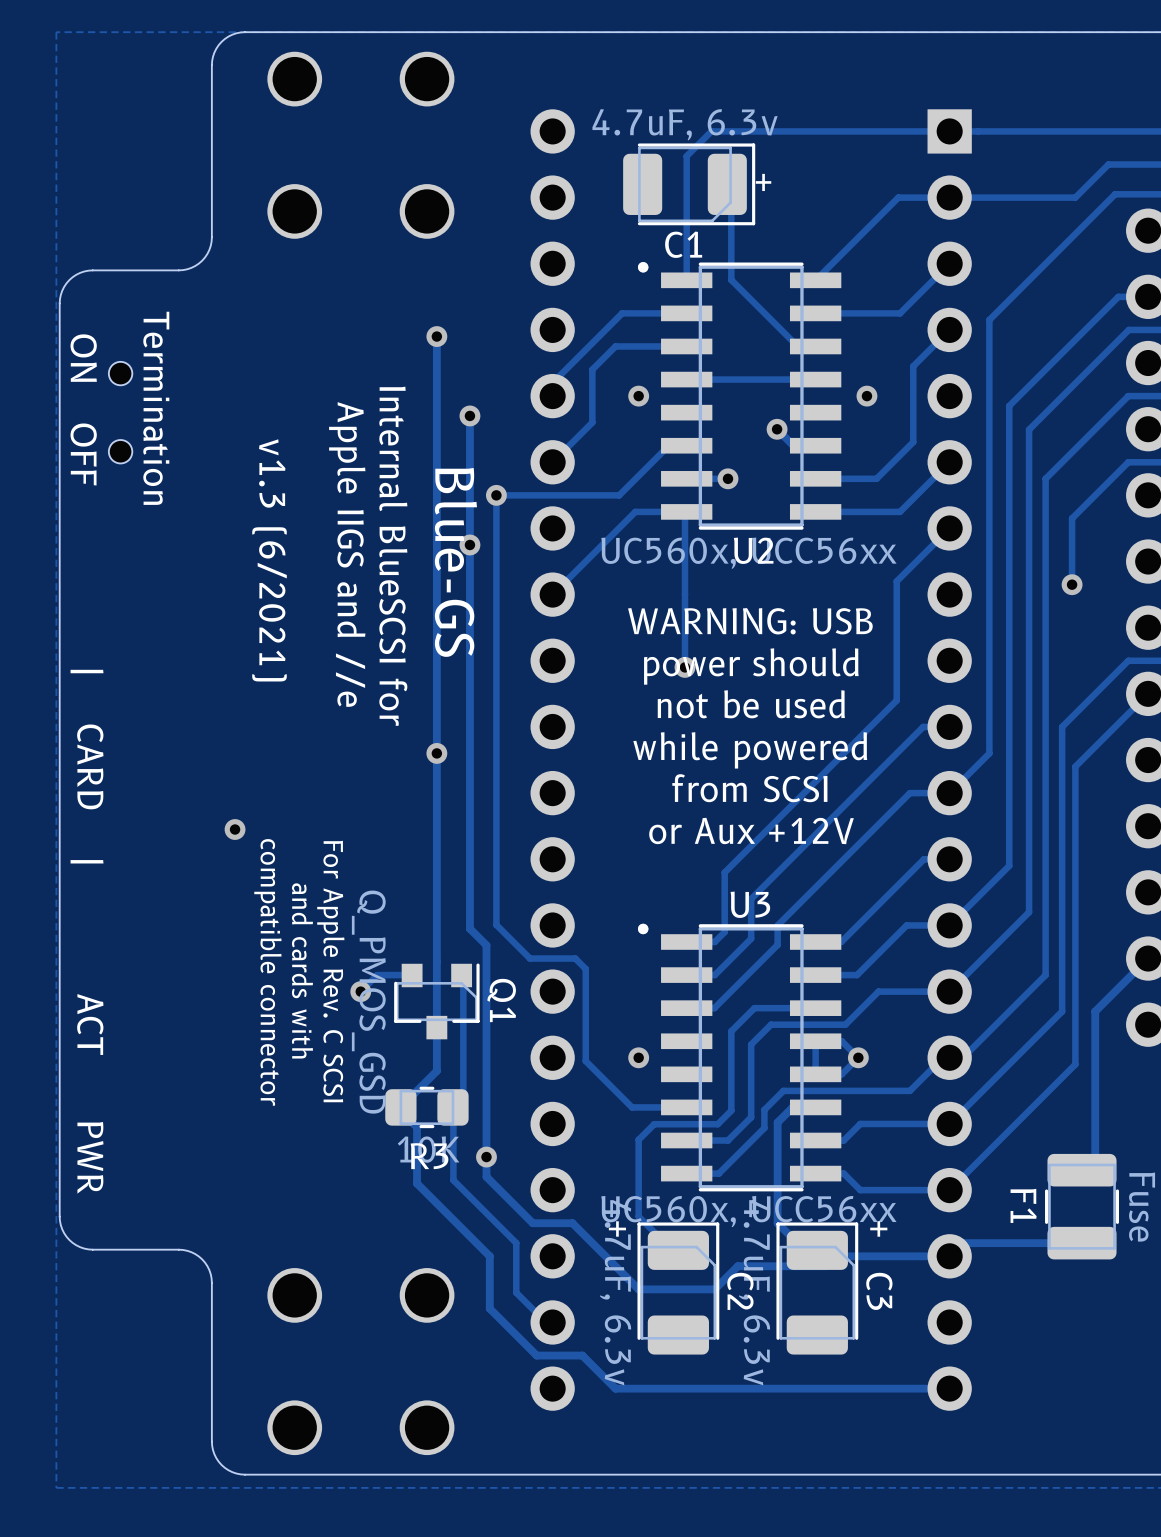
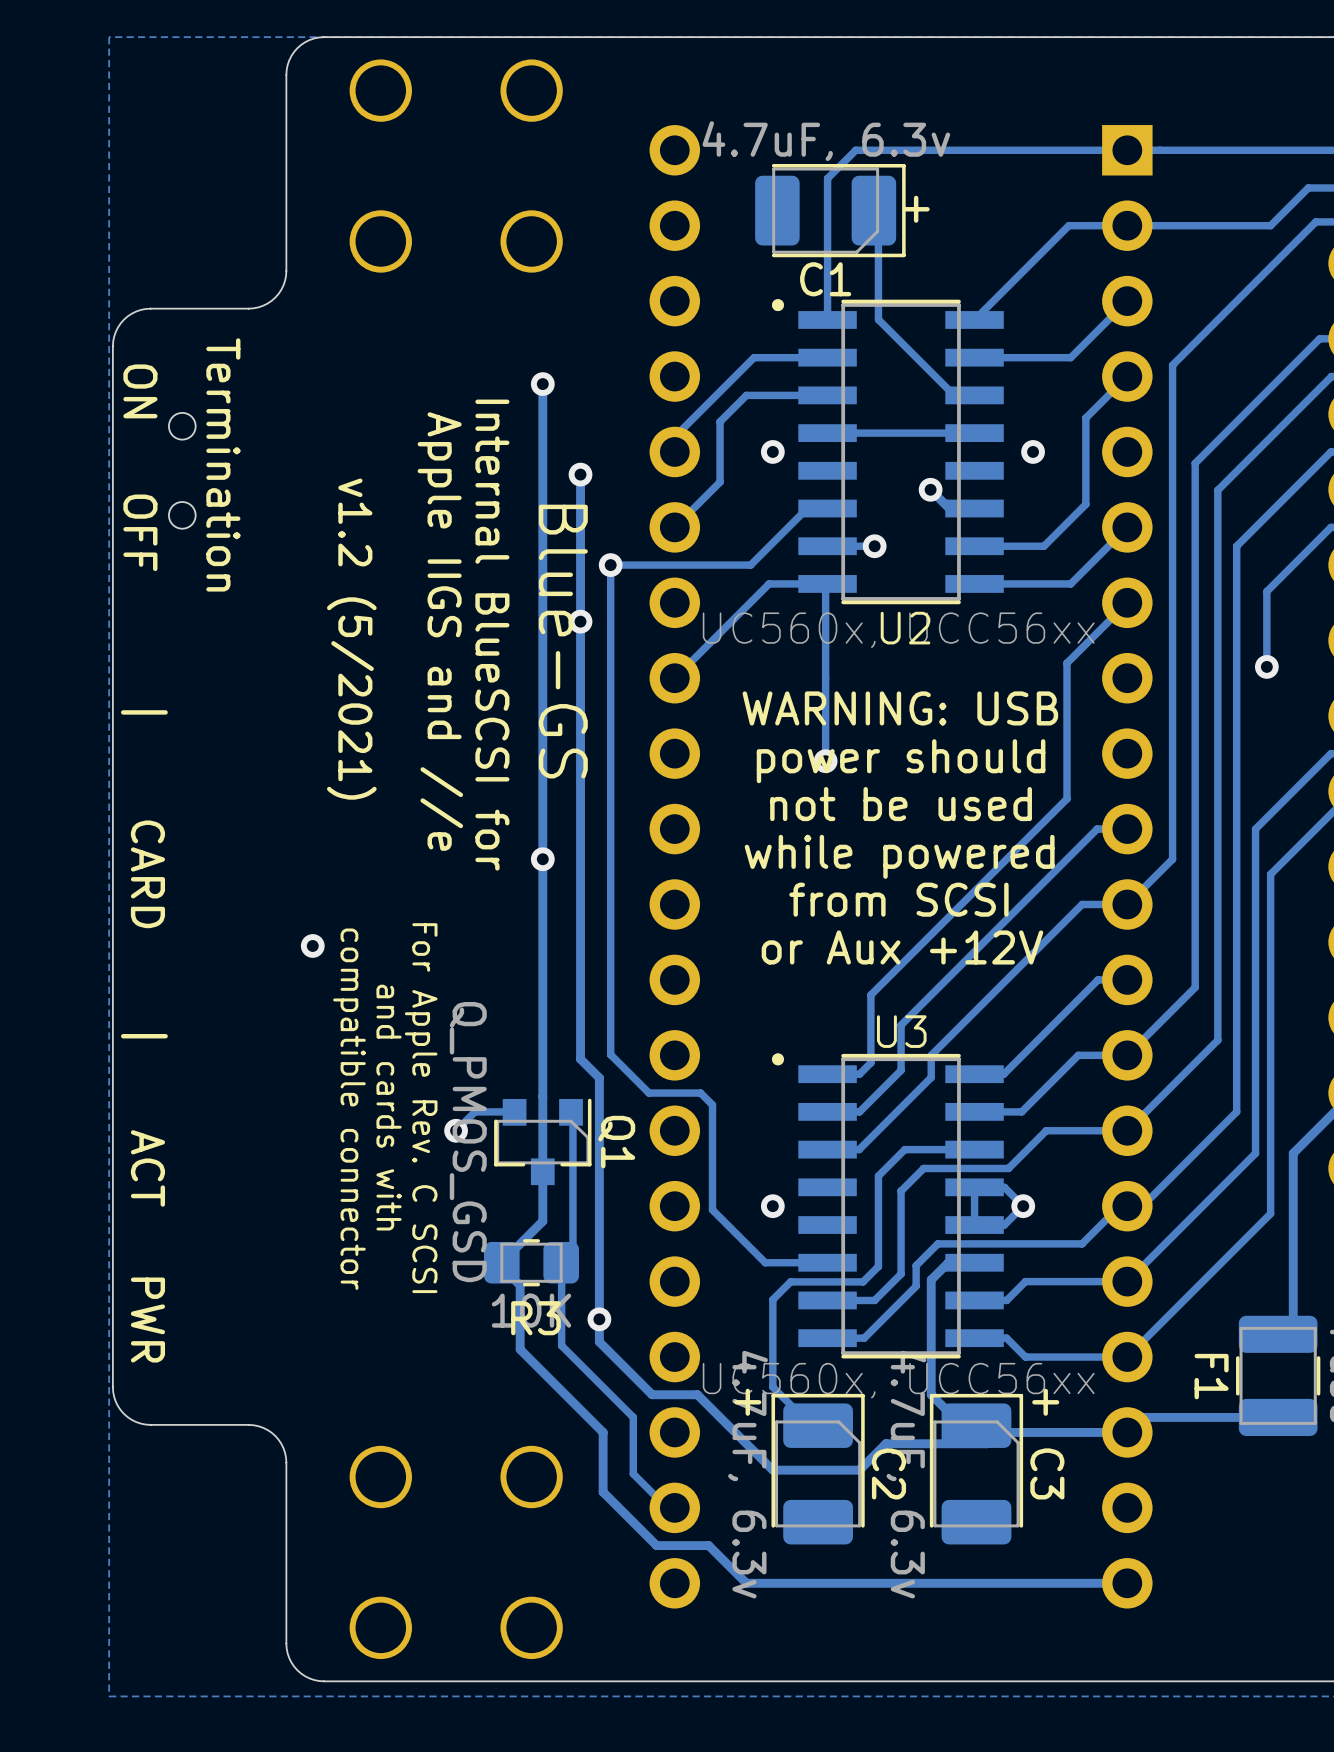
text: v1.3 (6/2021) (269, 560) -> v1.2 (5/2021) (351, 639)

